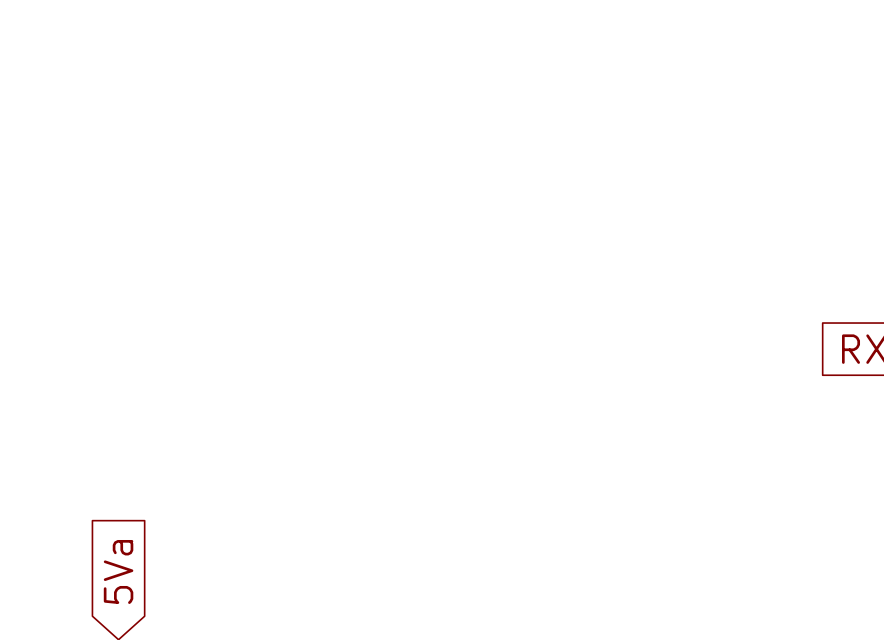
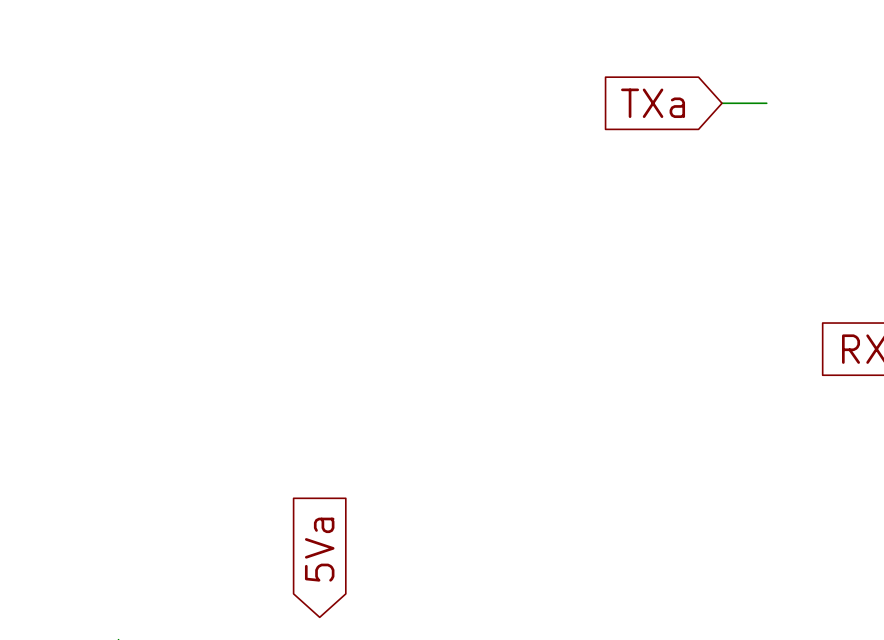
global label: none -> TXa (653, 103)
wire: none -> (722, 103) (766, 103)
global label position: 5Va (118, 571) -> 5Va (319, 549)

